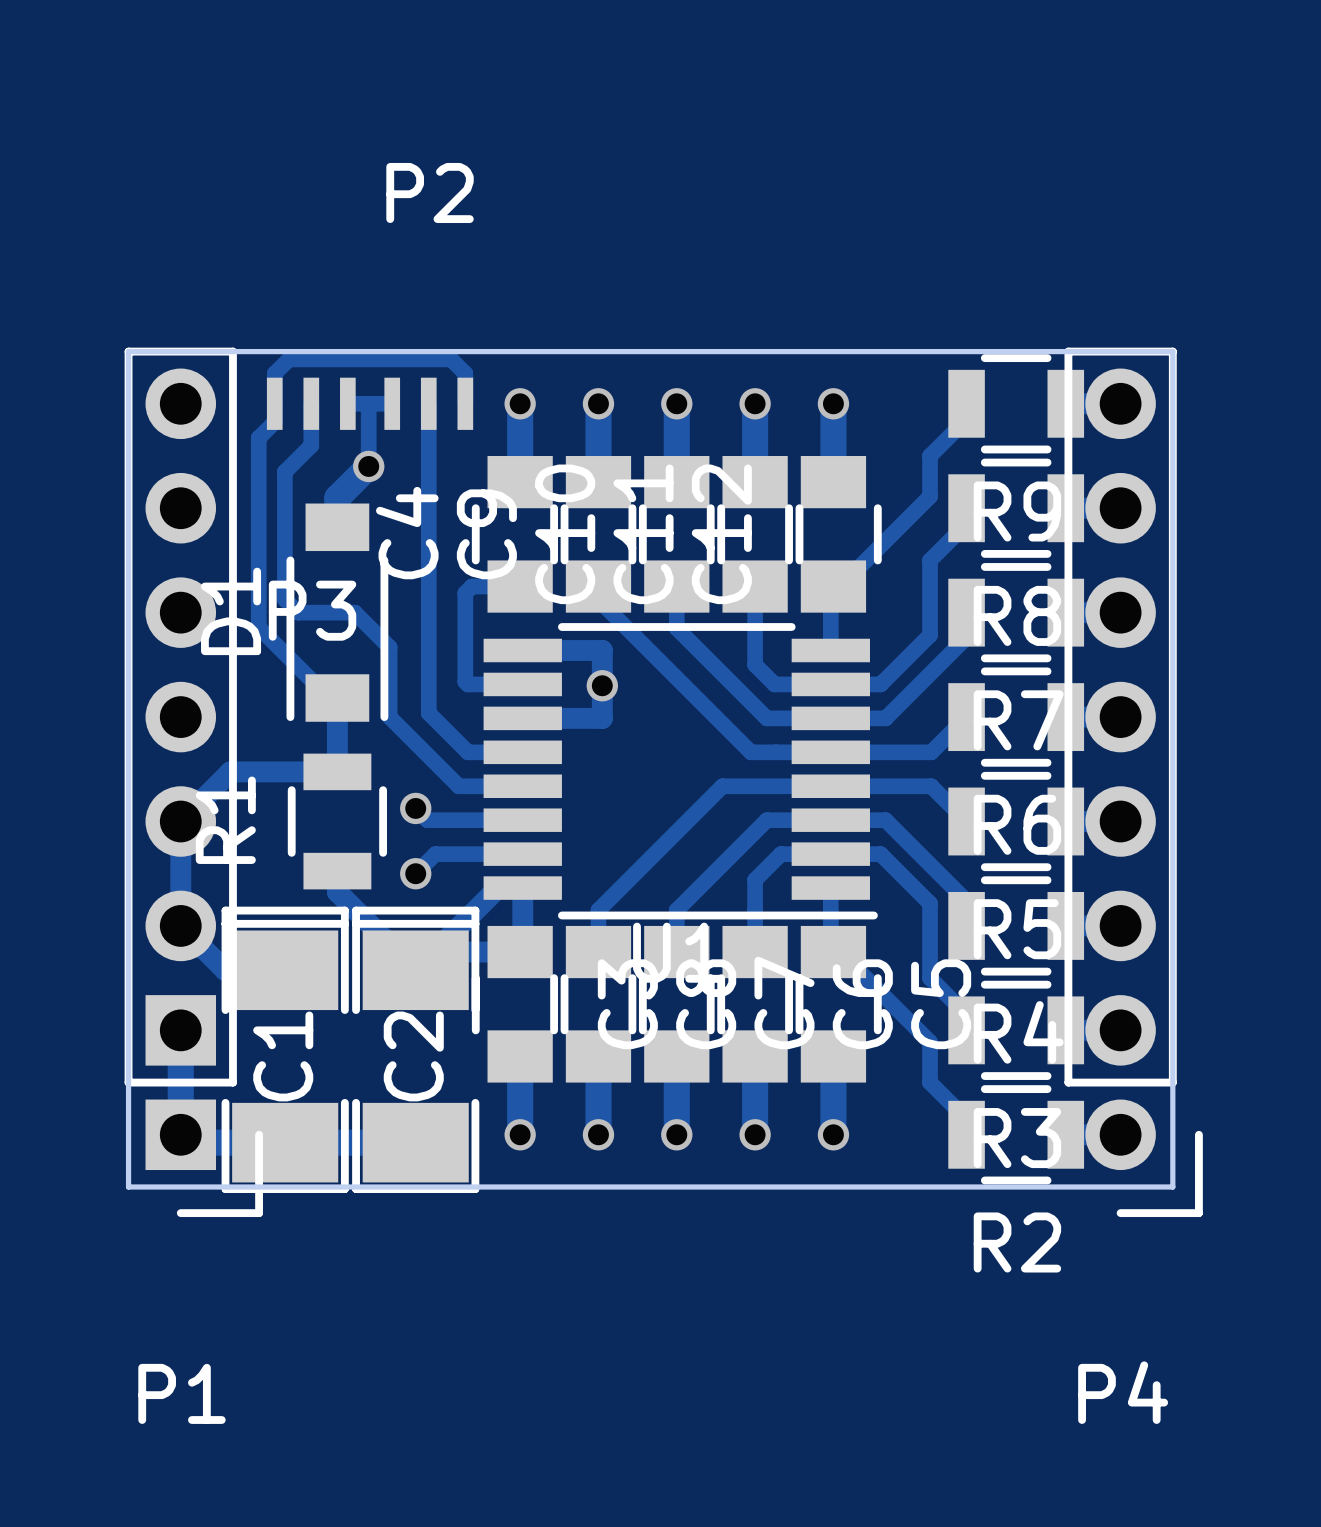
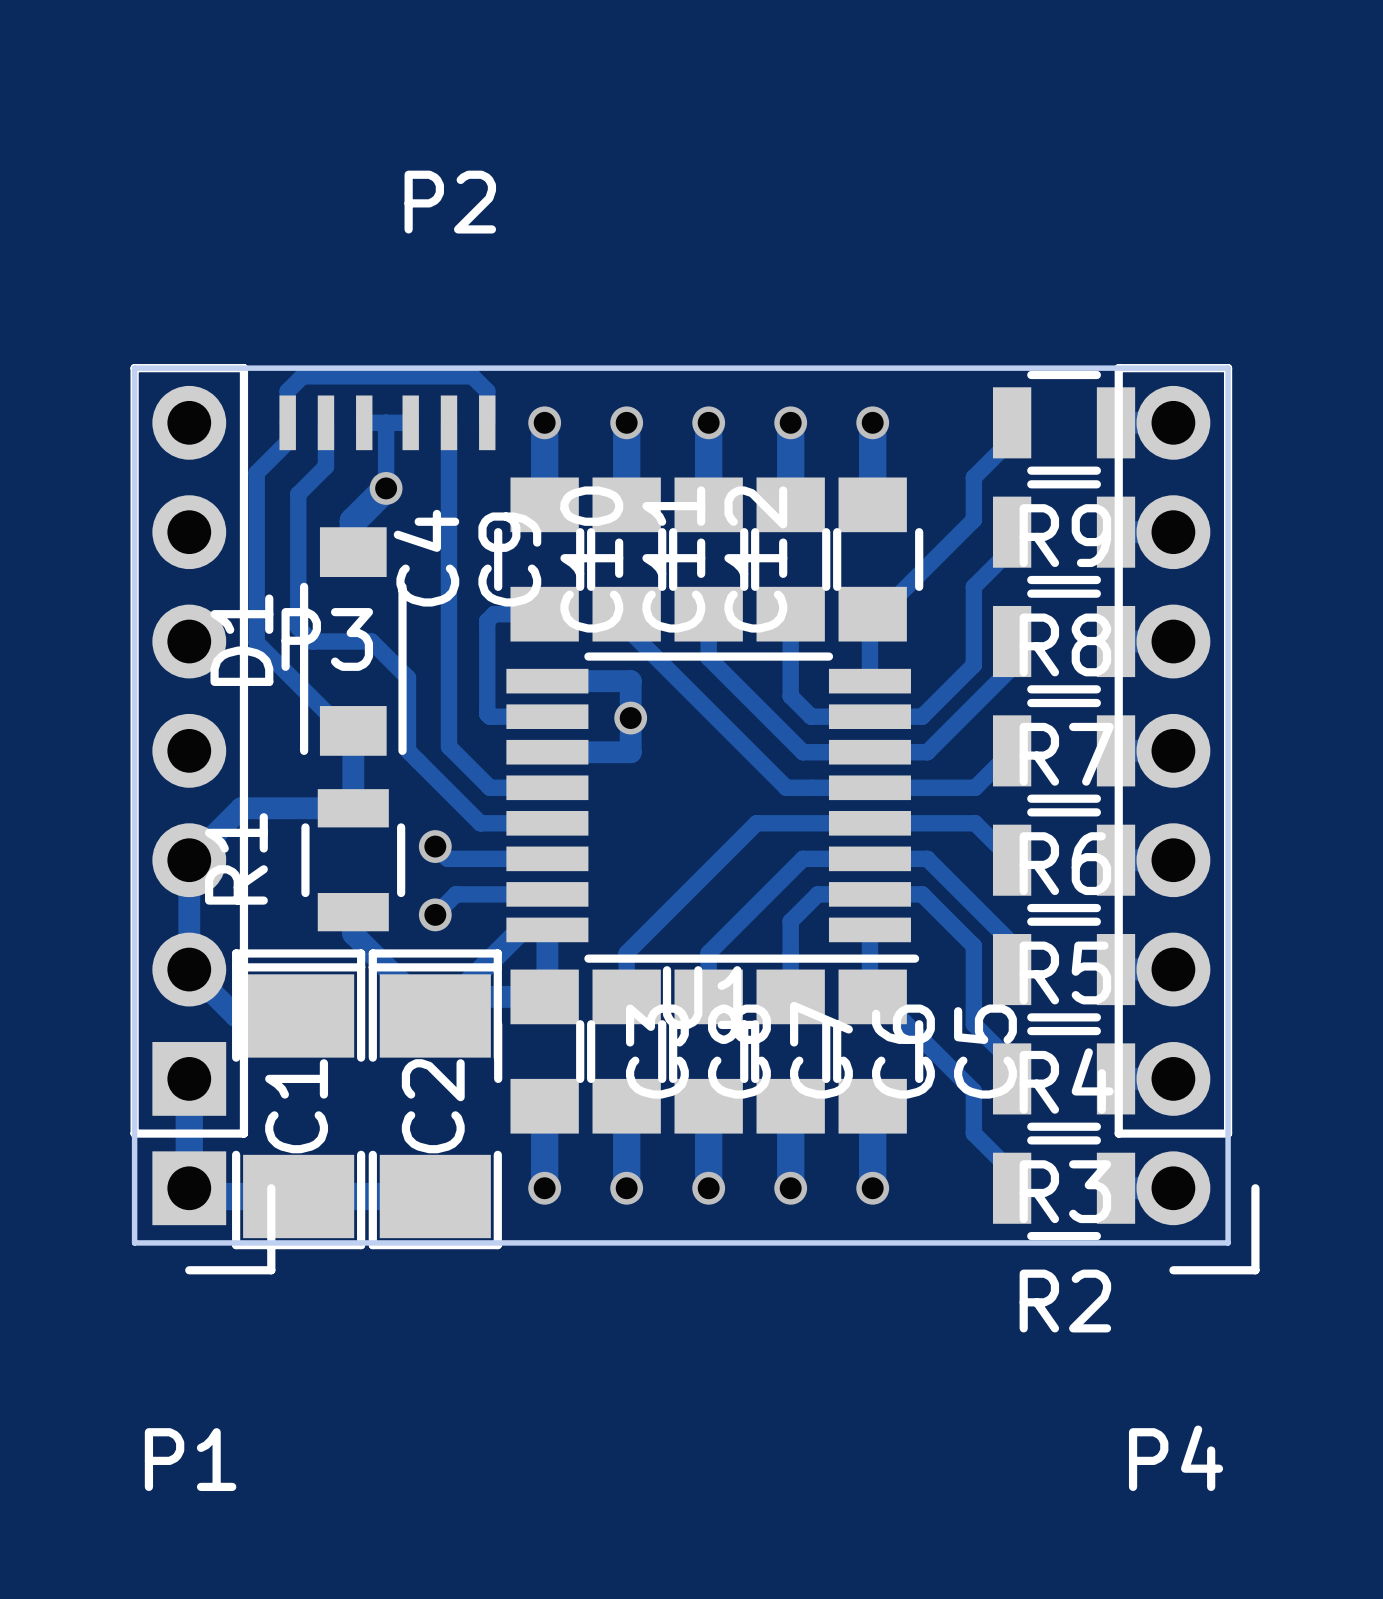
track: (258, 438) (258, 627) -> (270, 458) (256, 472) (256, 642) (270, 657)

